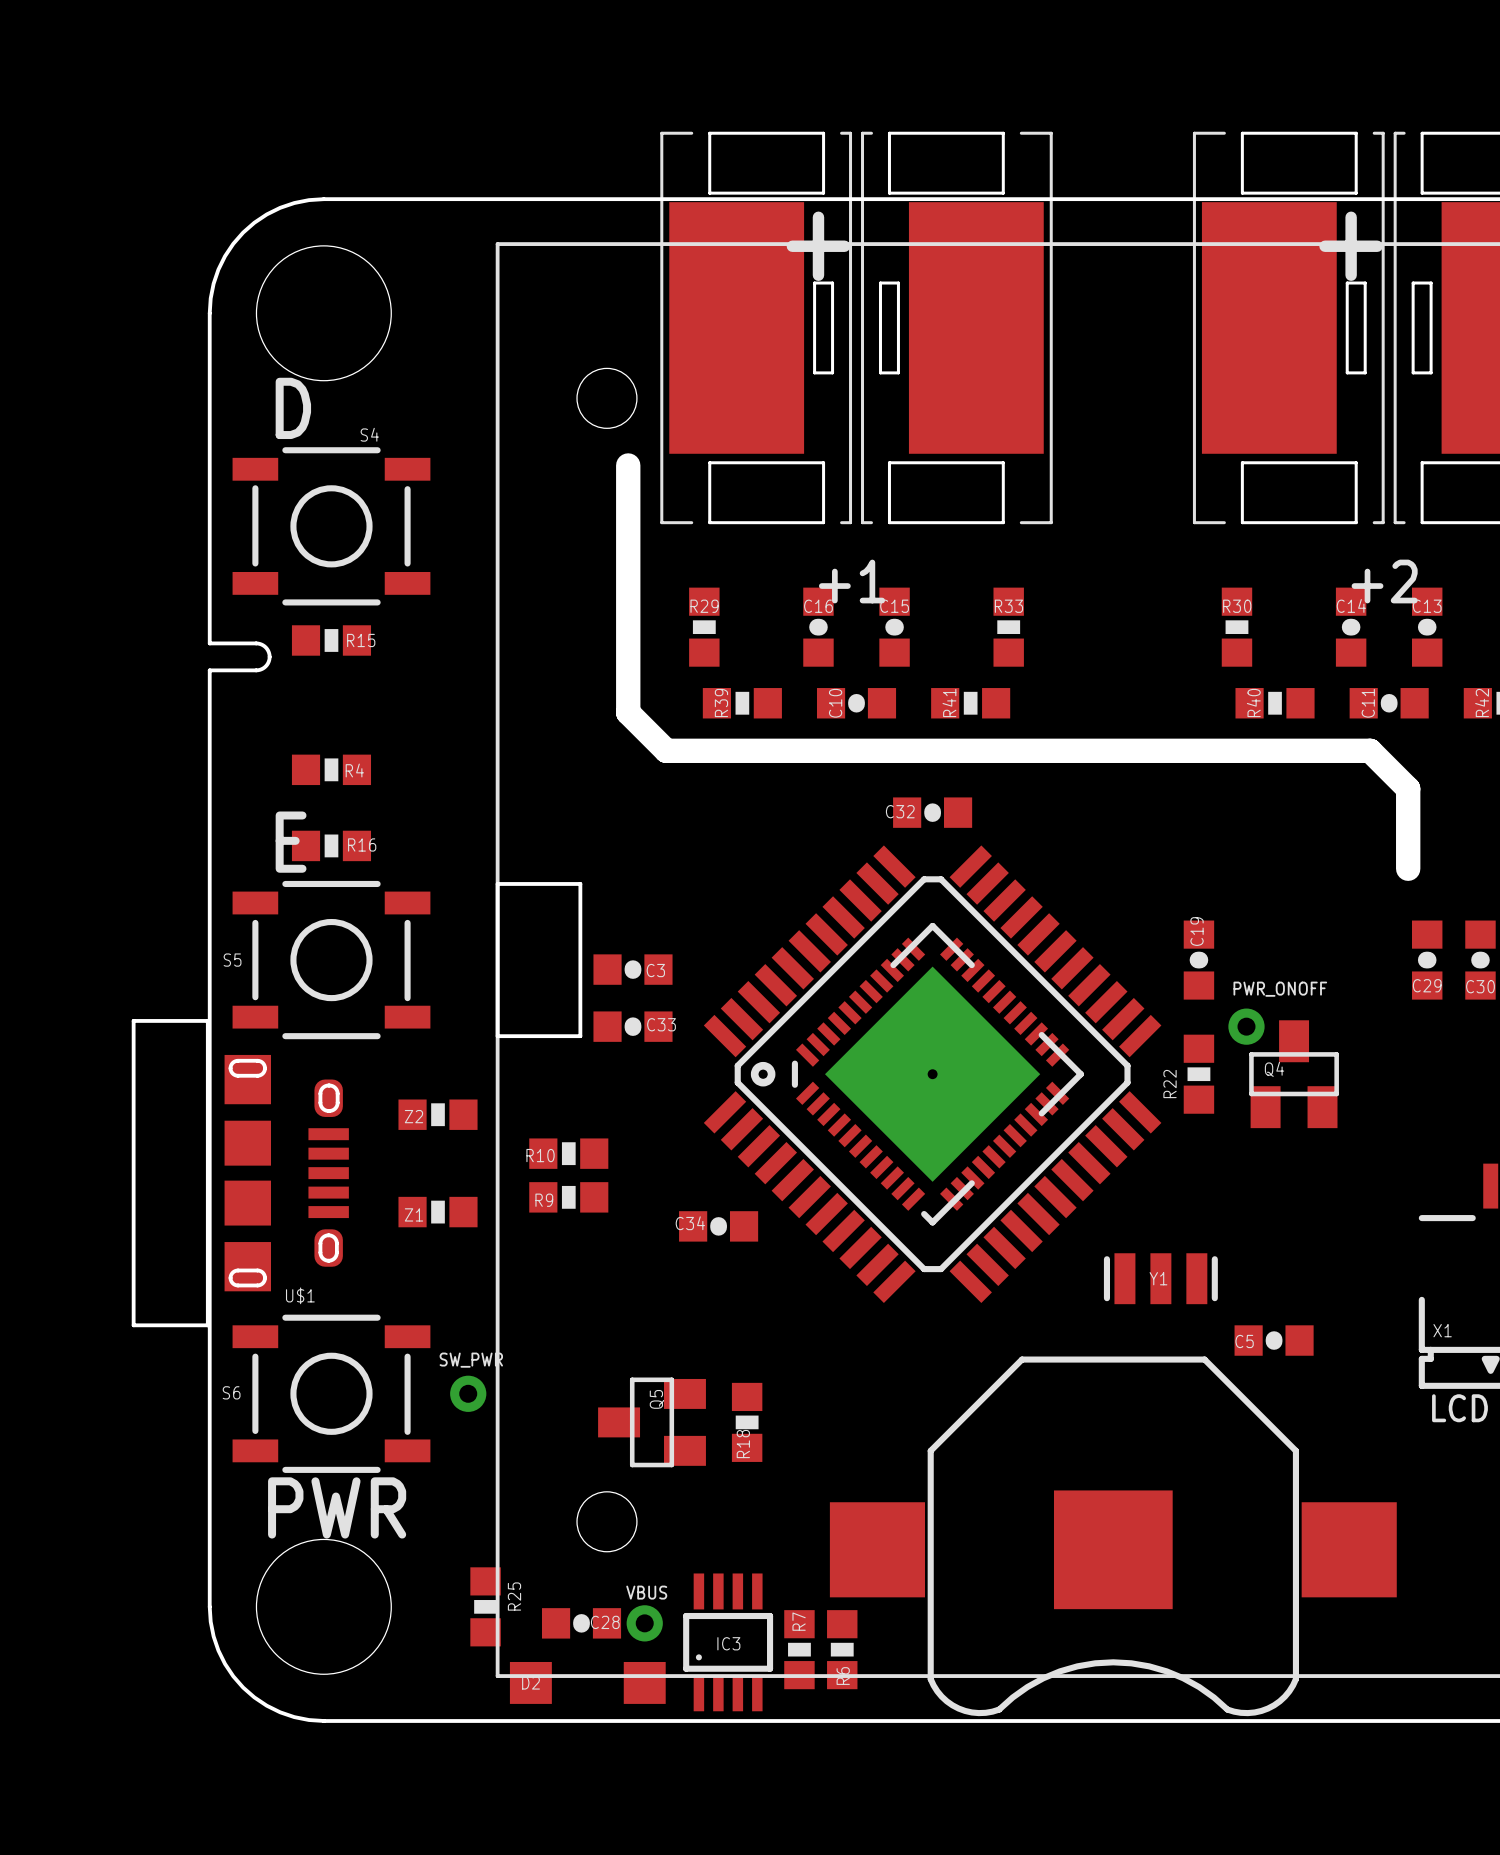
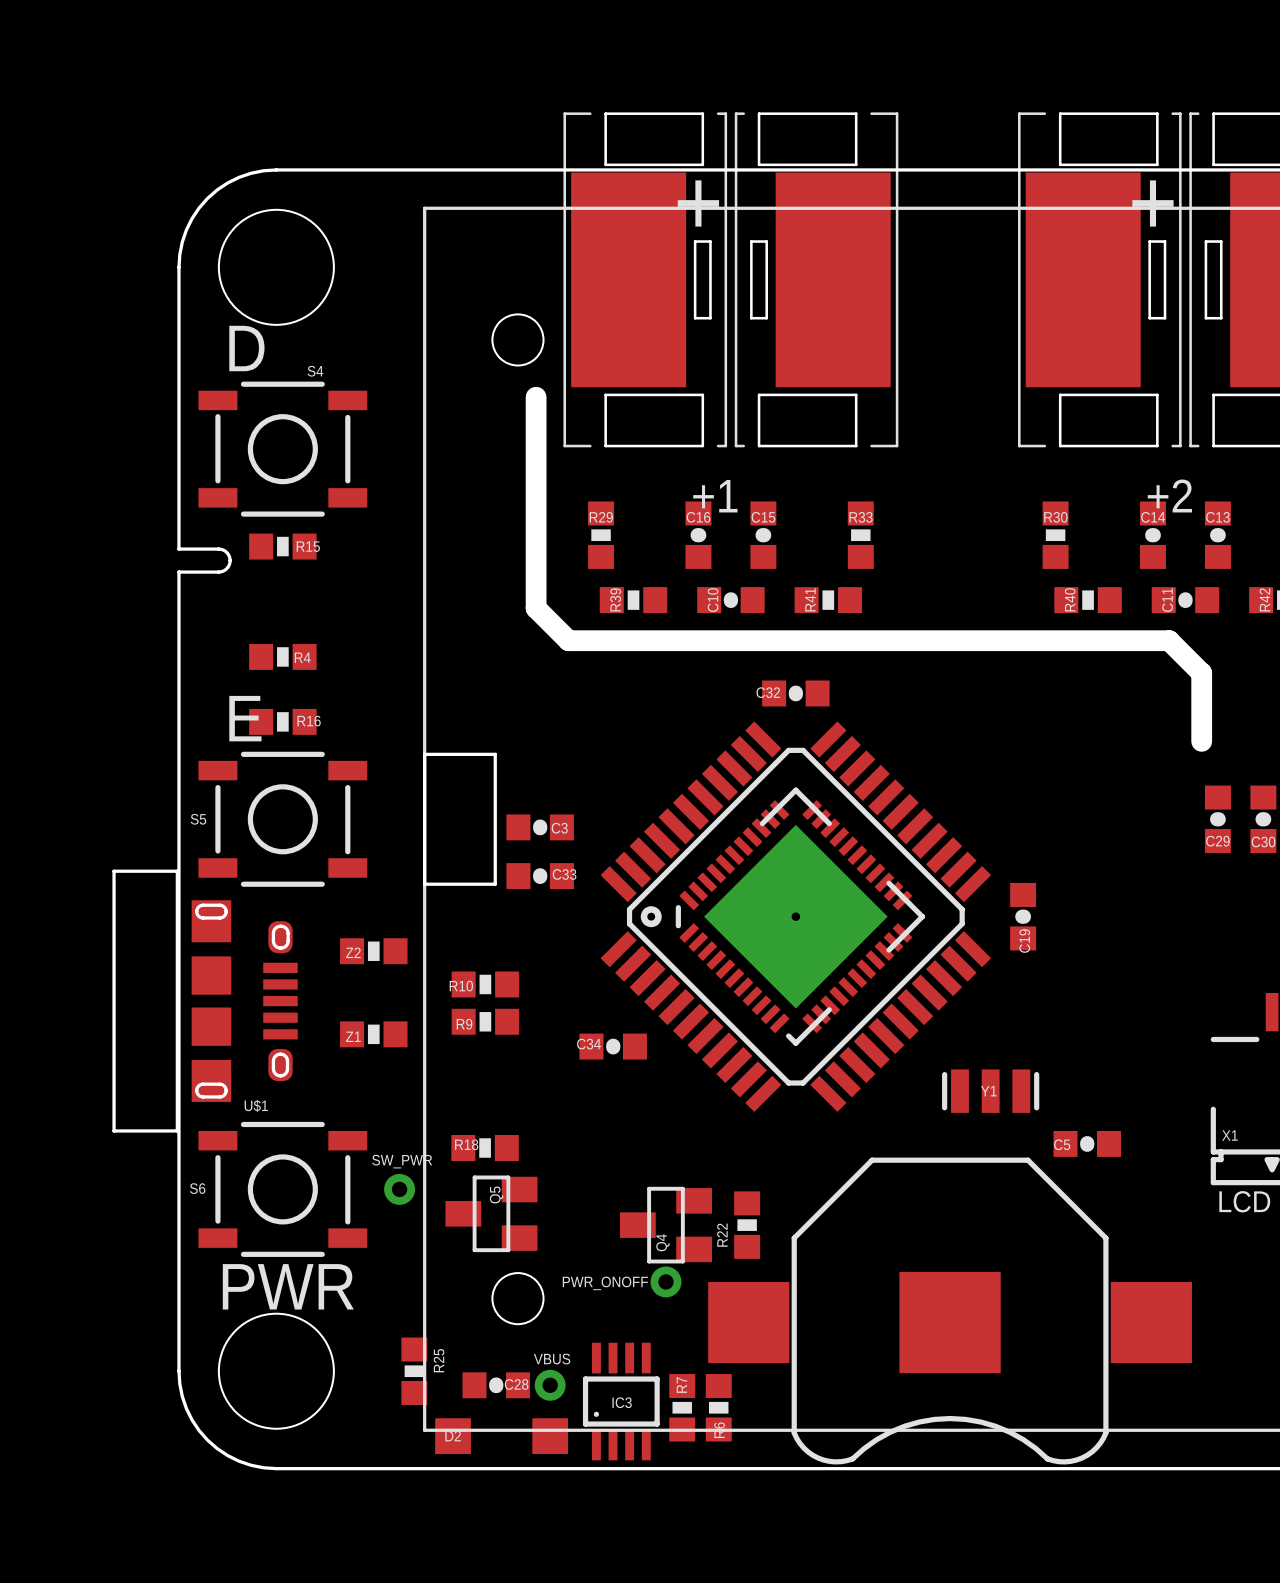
C19 name position: C19 (1197, 931) -> C19 (1024, 941)
C19 position: (1198, 960) -> (1023, 916)
text: PWR_ONOFF (1280, 989) -> none
part position: (1246, 1026) -> (665, 1281)
R22 position: (1198, 1074) -> (747, 1225)
Q4 rotation: 0° (1294, 1074) -> 90° counterclockwise (665, 1225)
Q4 position: (1294, 1074) -> (665, 1225)
Q5 position: (652, 1422) -> (491, 1213)
R18 rotation: 0° (747, 1422) -> 90° clockwise (485, 1148)
R18 position: (747, 1422) -> (485, 1148)
text: none -> PWR_ONOFF (605, 1283)

